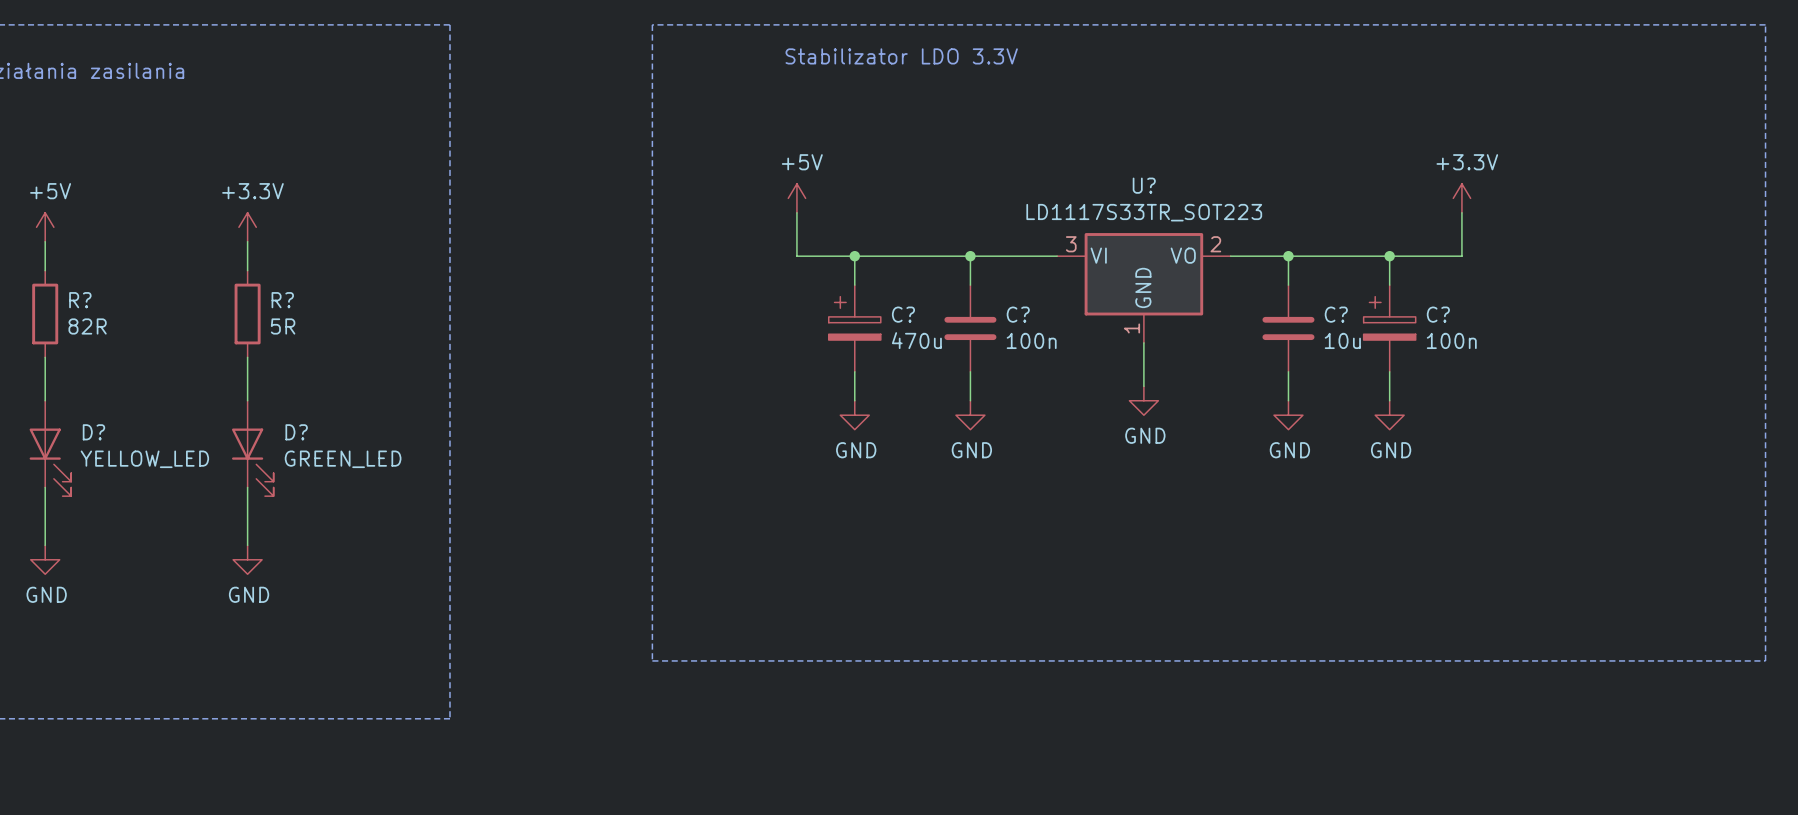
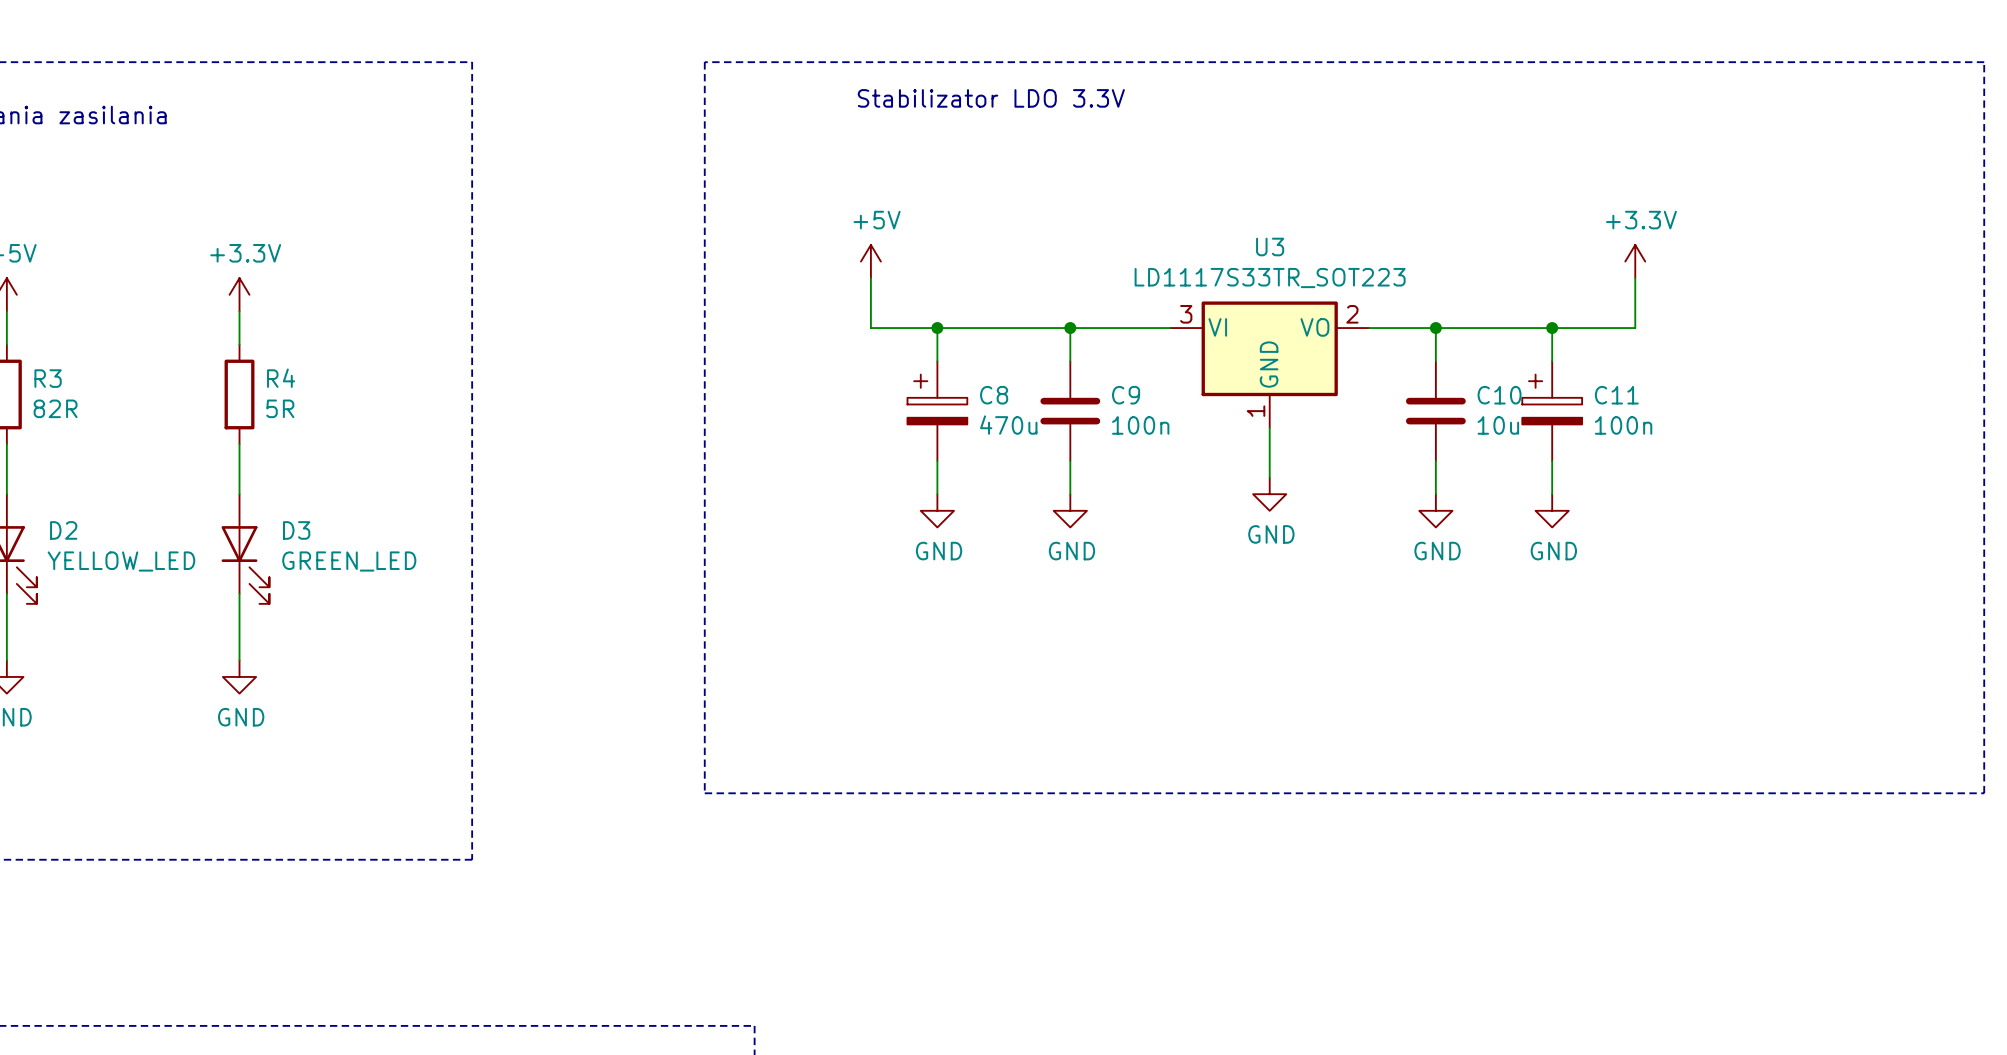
U? name: U? (1144, 185) -> U3 (1270, 246)
R? name: R? (80, 300) -> R3 (48, 378)
R? name: R? (282, 300) -> R4 (281, 378)
C? name: C? (903, 314) -> C8 (994, 395)
C? name: C? (1018, 314) -> C9 (1126, 395)
C? name: C? (1336, 314) -> C10 (1499, 395)
C? name: C? (1438, 314) -> C11 (1616, 395)
D? name: D? (93, 432) -> D2 (63, 530)
D? name: D? (296, 432) -> D3 (296, 530)

